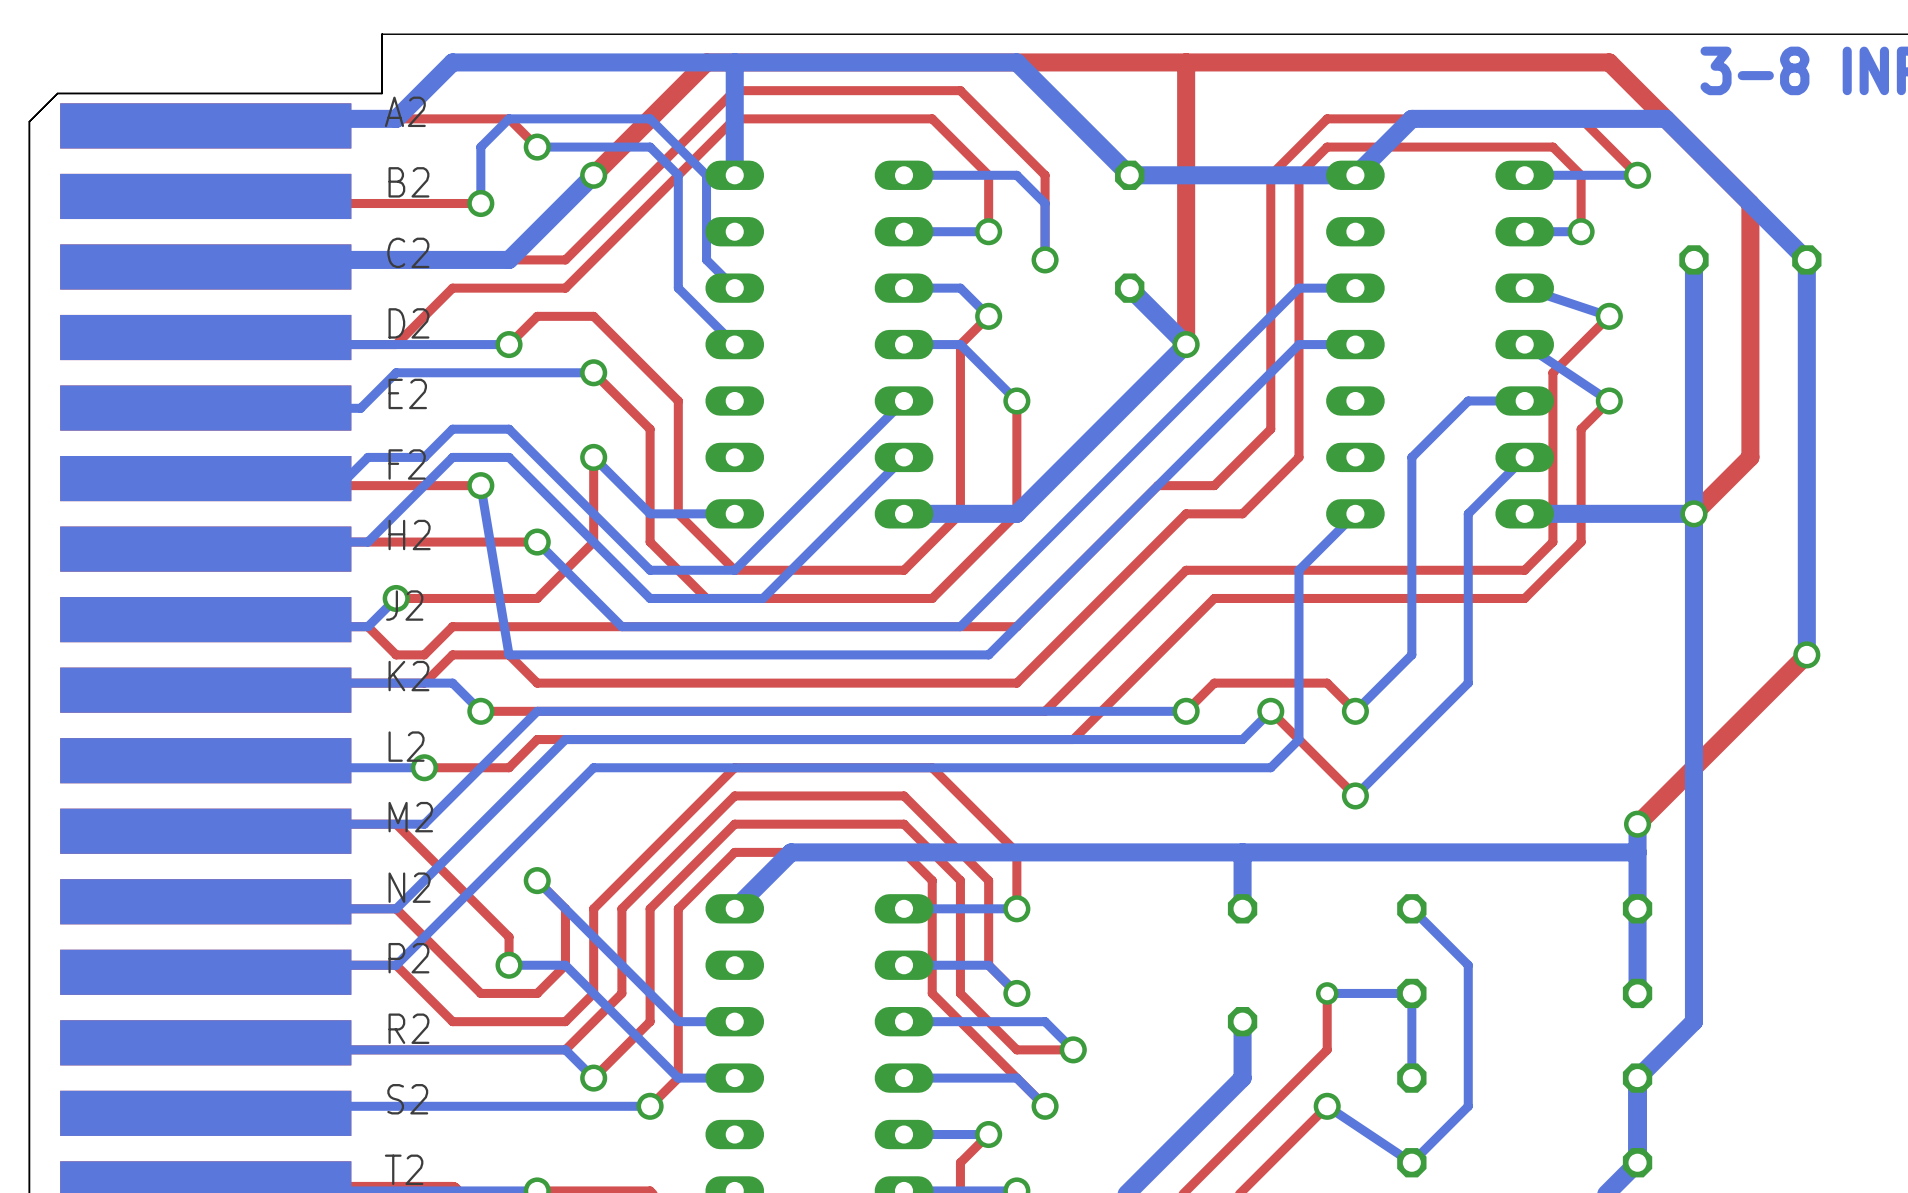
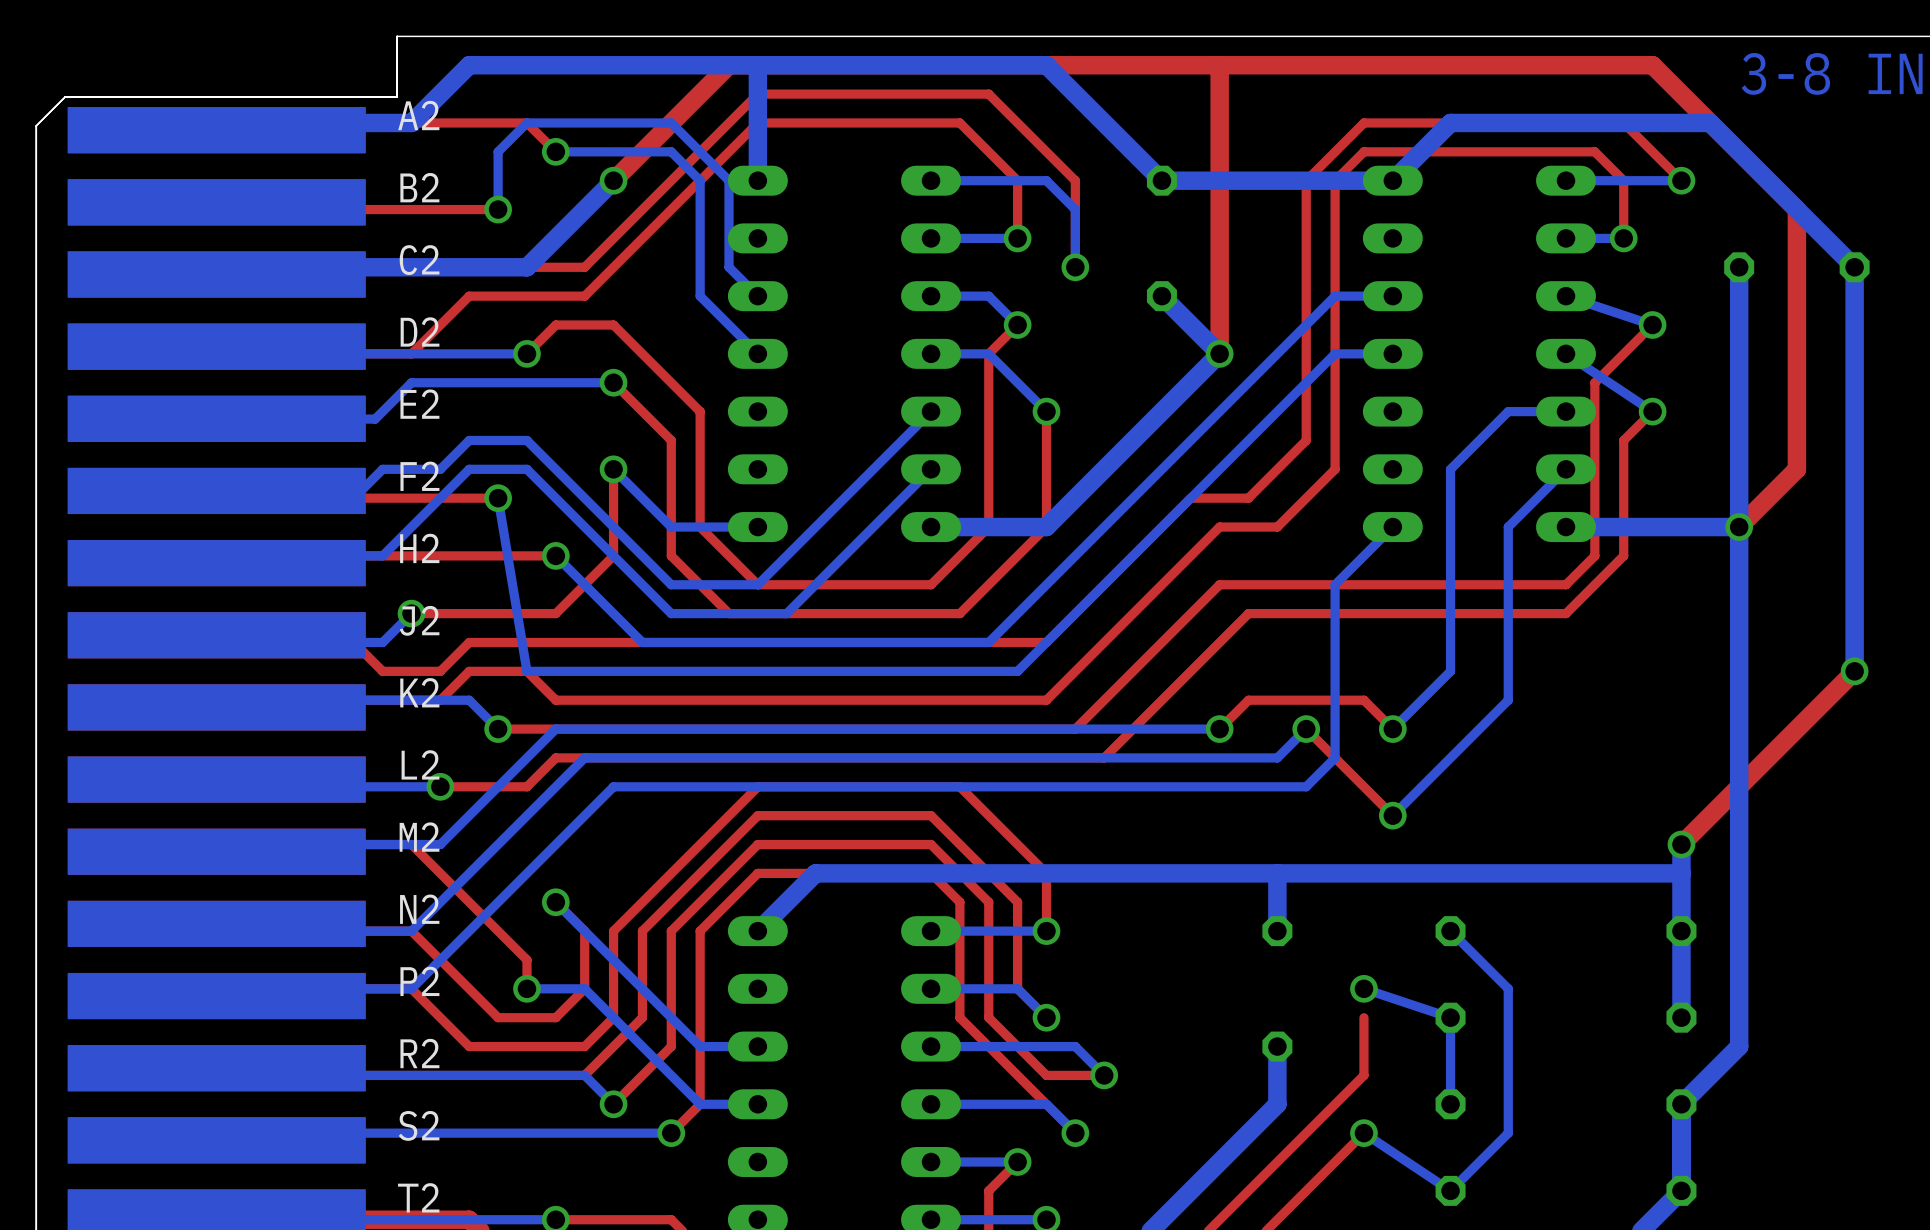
top track: (339, 626) (367, 626) (396, 654) -> (353, 642) (382, 671) (411, 671)
via: none -> (1363, 988)
via: (1327, 993) -> none
bottom track: (1411, 993) (1327, 993) -> (1450, 1017) (1363, 988)

